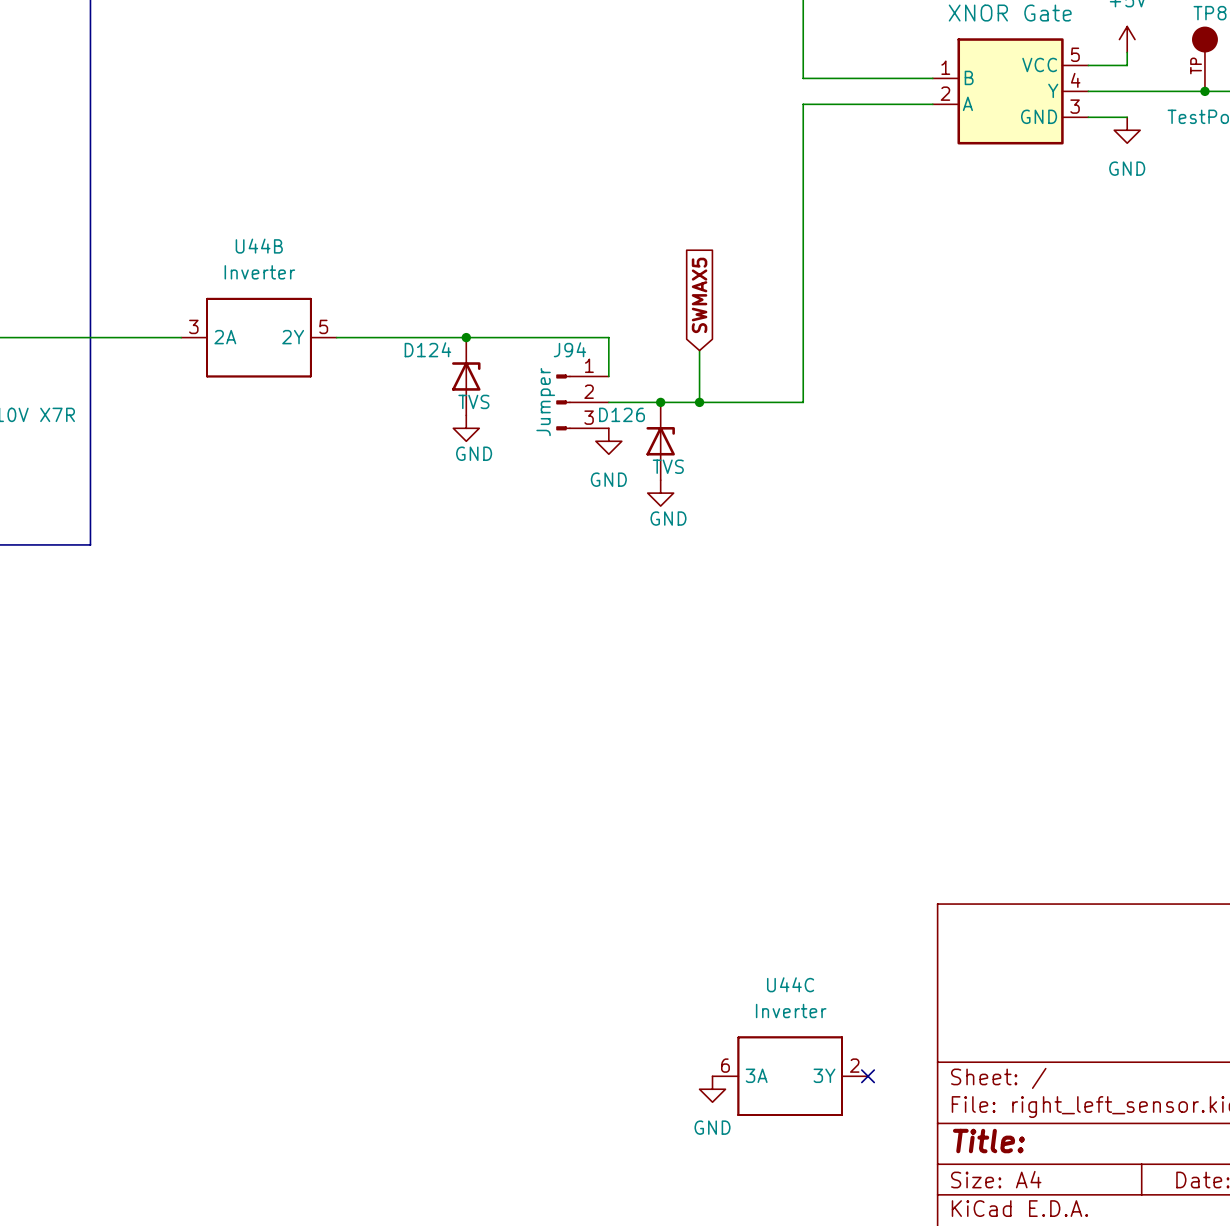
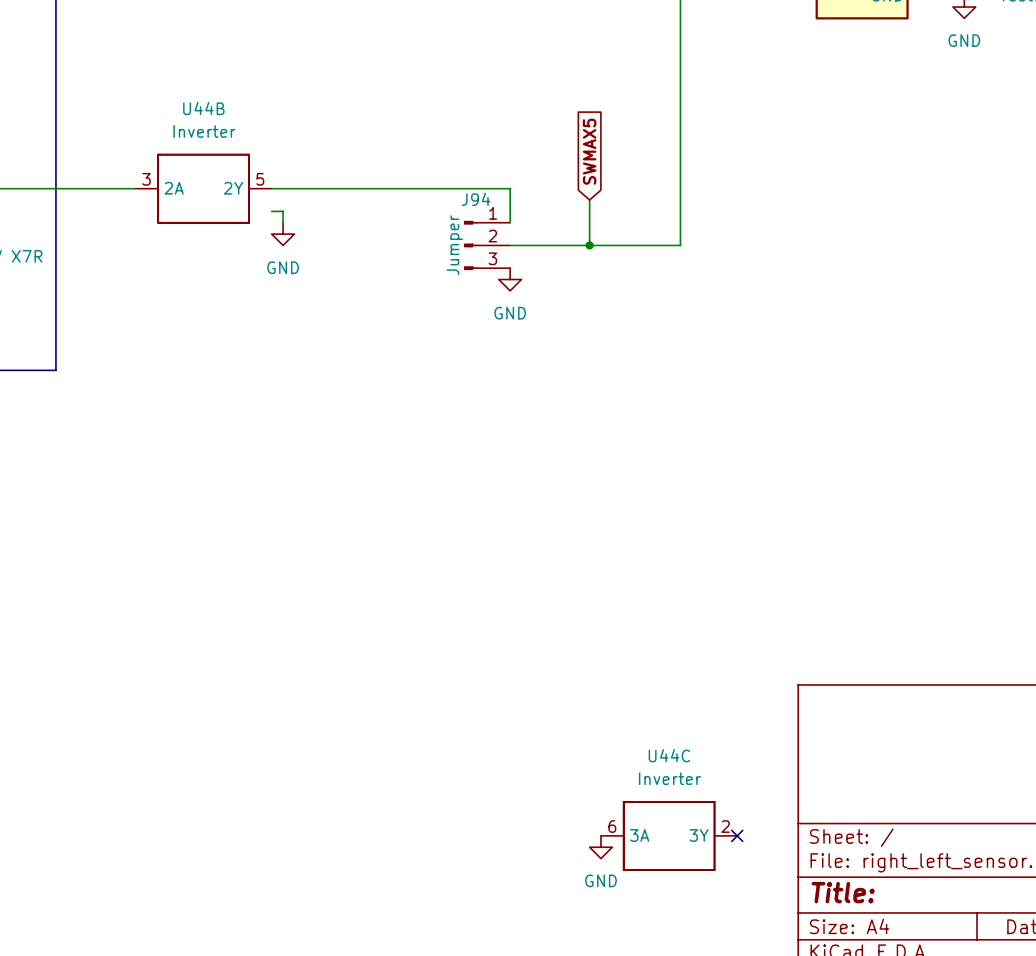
junction: (466, 337) -> none
wire: none -> (271, 211) (283, 211) (283, 222)
D124: TVS (466, 376) -> none
junction: (660, 402) -> none
power symbol position: GND (466, 428) -> GND (283, 234)
D126: TVS (660, 441) -> none
power symbol text position: GND (474, 453) -> GND (283, 267)
power symbol: GND (660, 493) -> none

